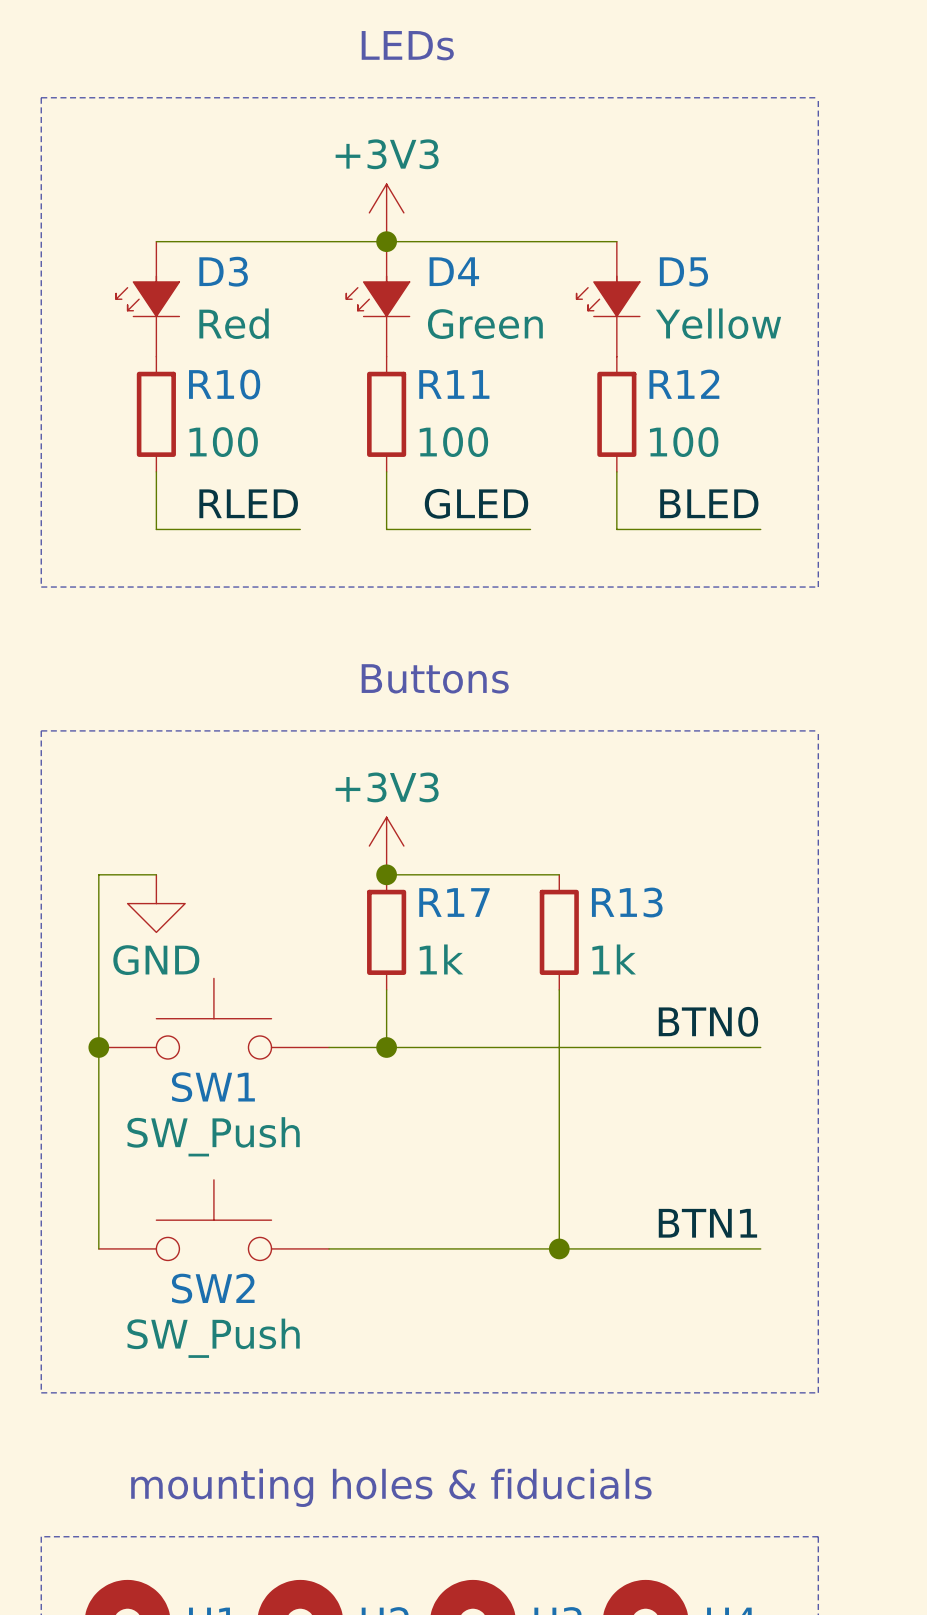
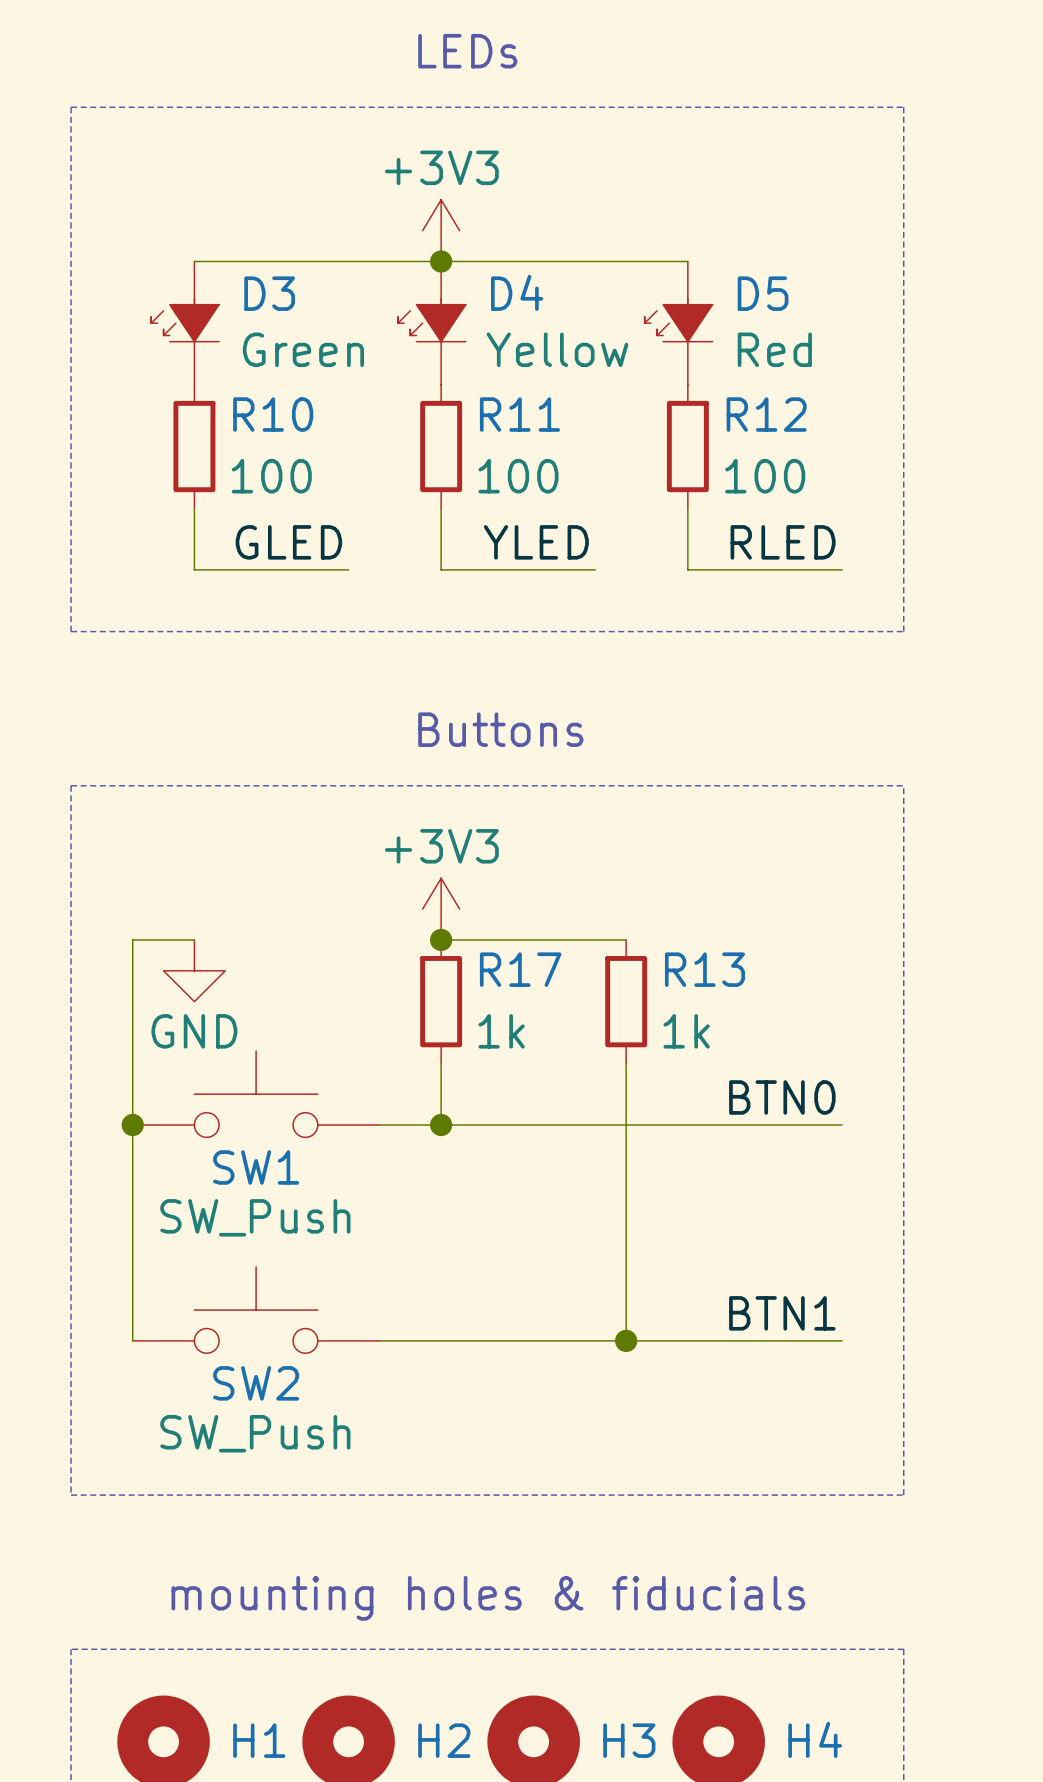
D3 value: Red (234, 323) -> Green (303, 349)
D5 value: Yellow (718, 323) -> Red (774, 349)
D4 value: Green (485, 324) -> Yellow (557, 349)
label: RLED (248, 503) -> GLED (288, 542)
label: GLED (476, 503) -> YLED (536, 542)
label: BLED (709, 503) -> RLED (783, 542)

